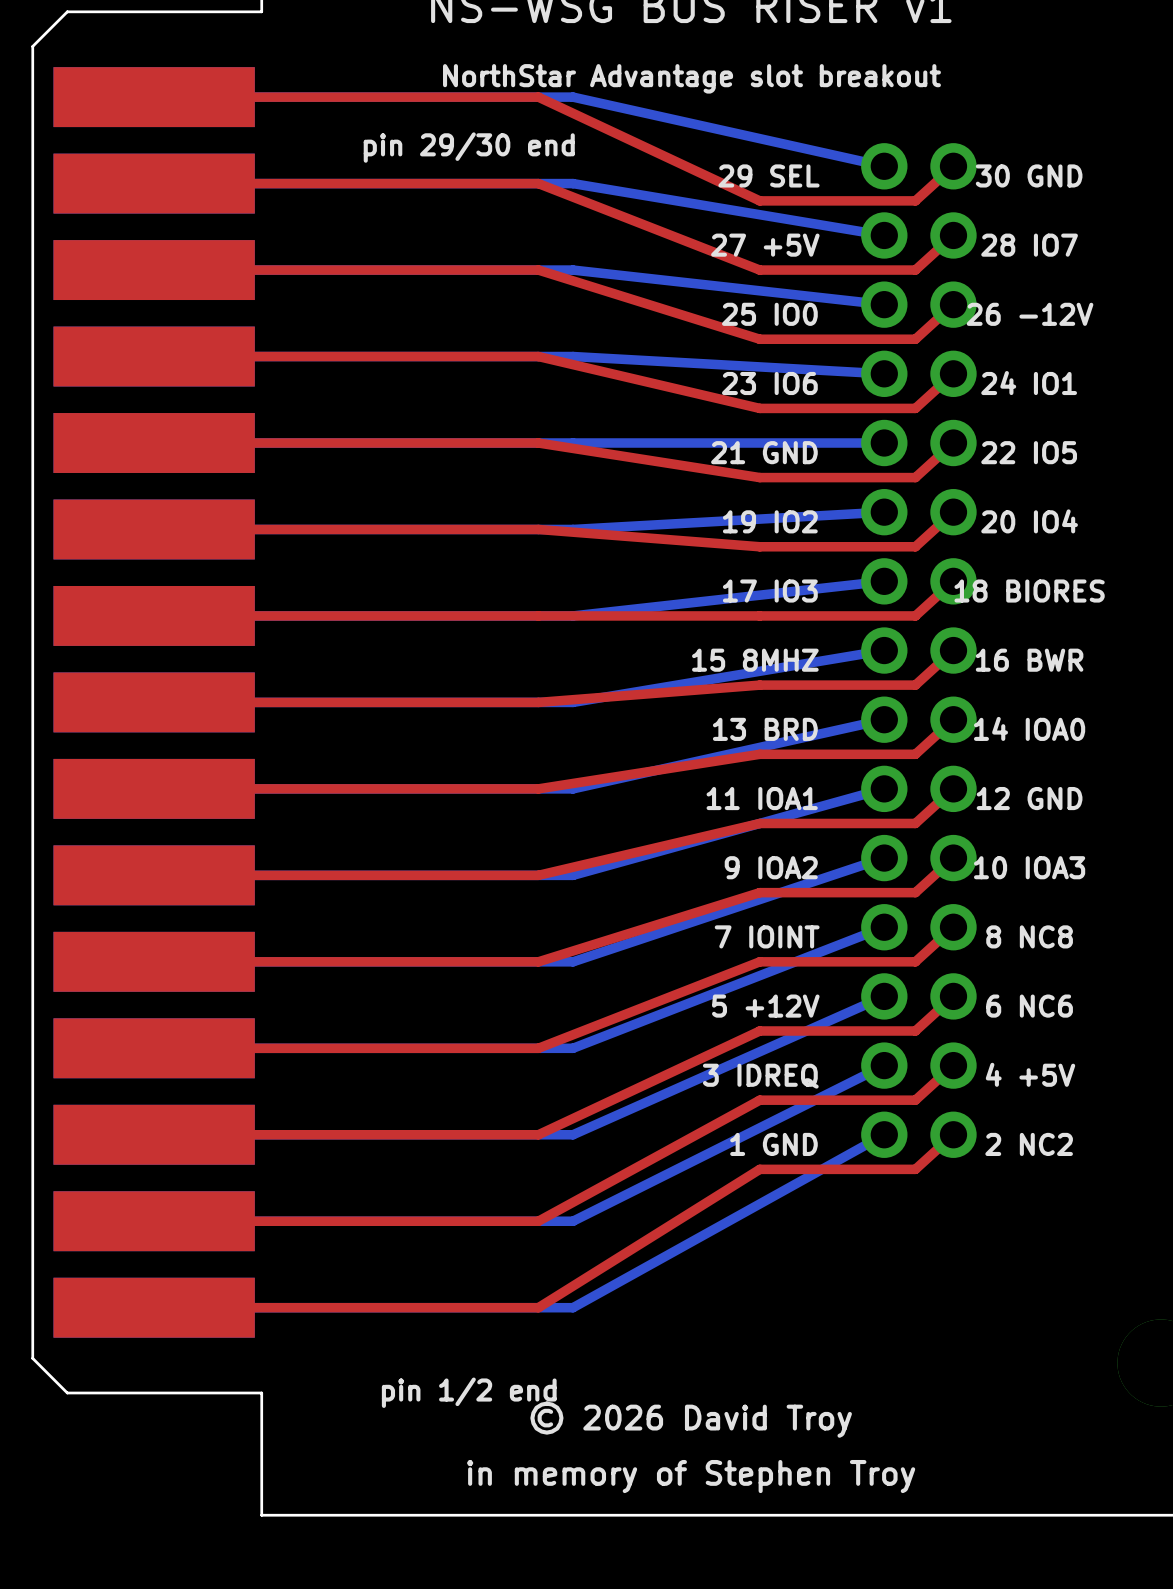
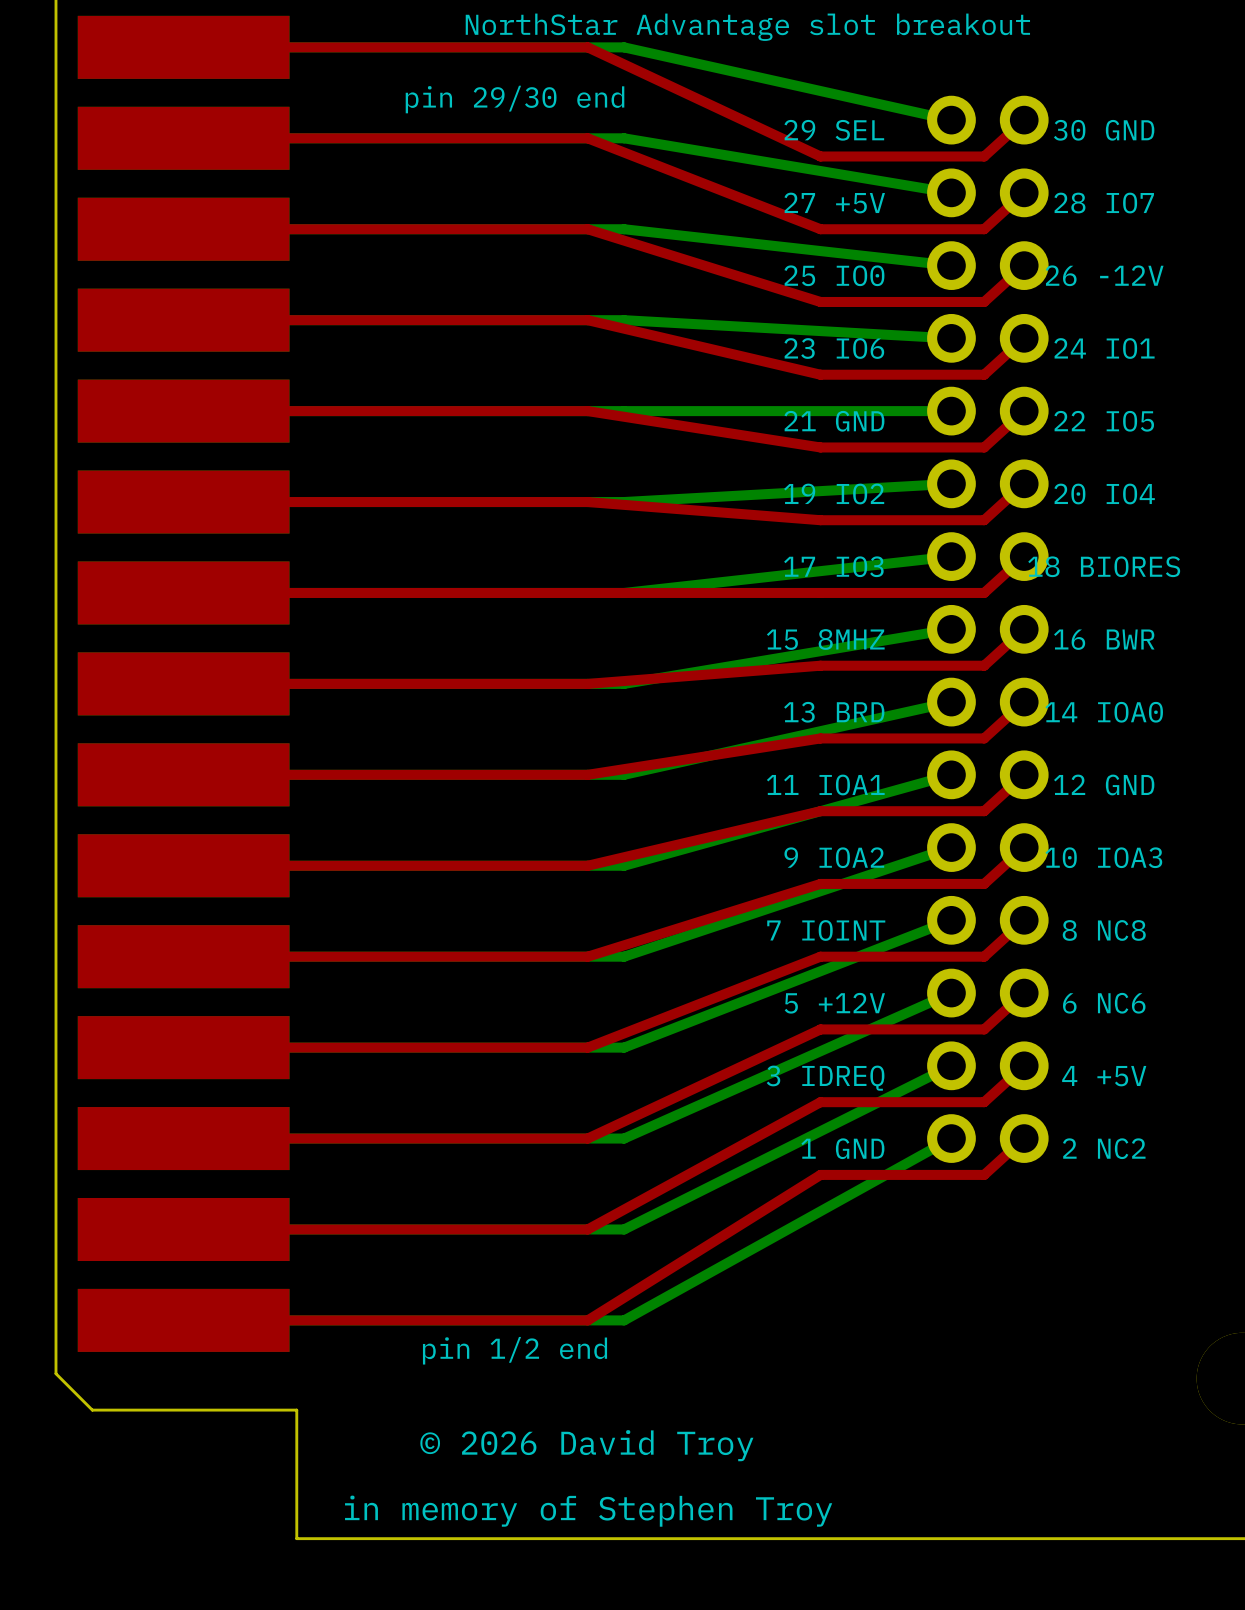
text position: pin 1/2 end (469, 1392) -> pin 1/2 end (515, 1350)
text position: © 2026 David Troy (691, 1419) -> © 2026 David Troy (586, 1445)
text position: in memory of Stephen Troy (691, 1476) -> in memory of Stephen Troy (588, 1511)

